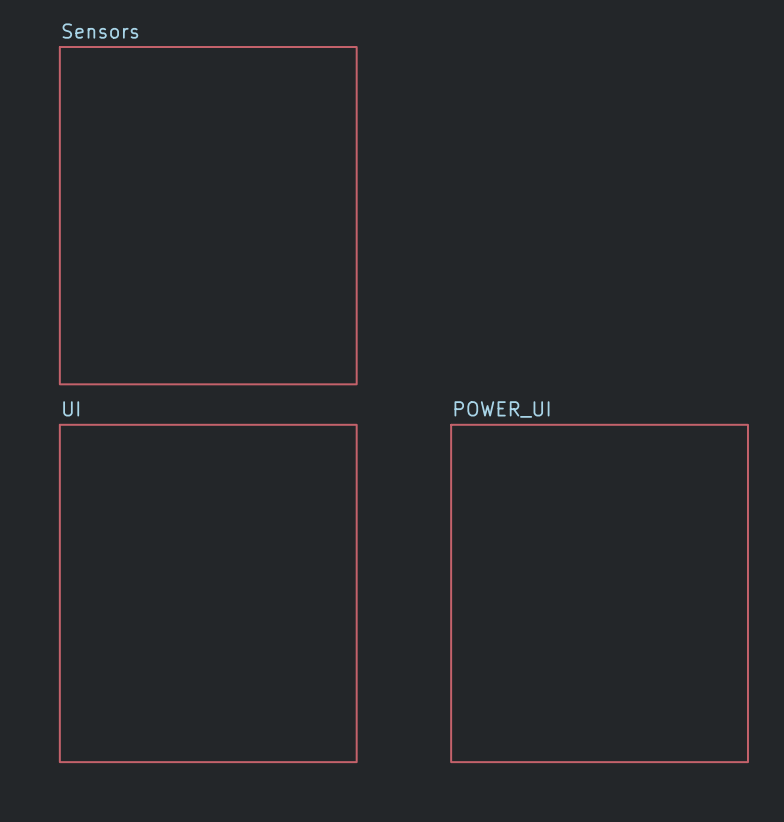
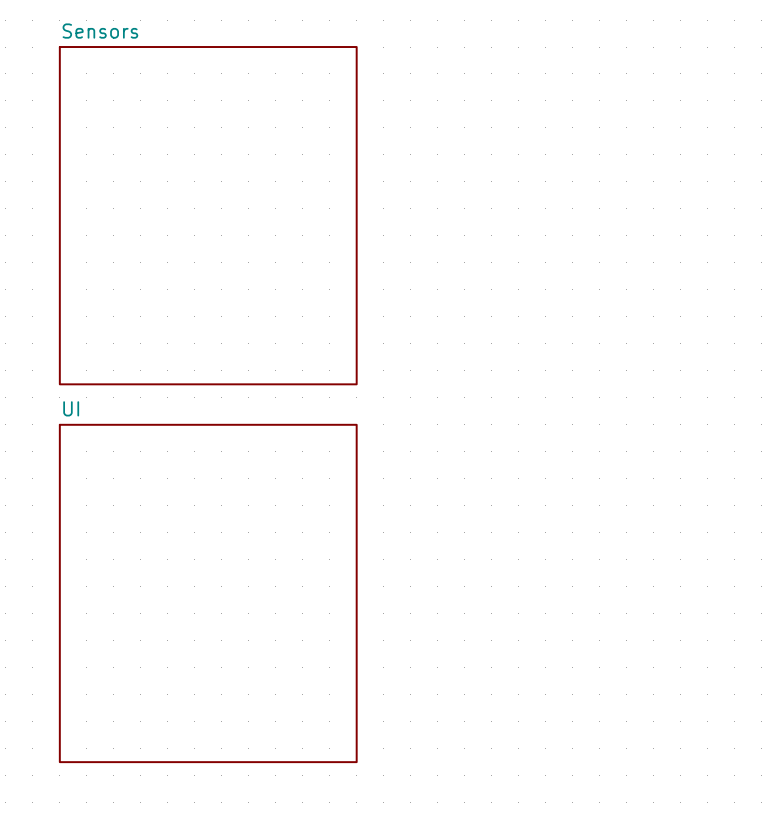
sheet POWER_UI: (599, 593) -> none

